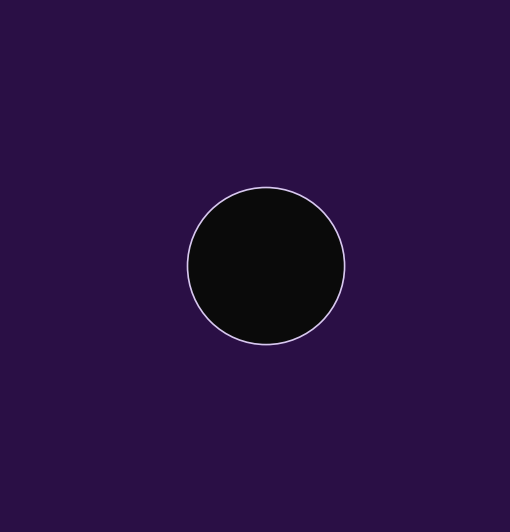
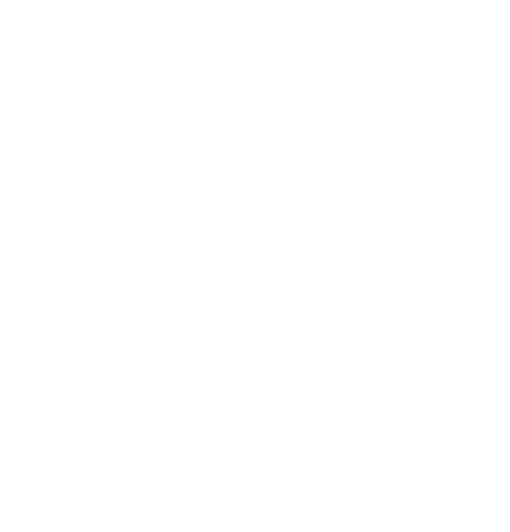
part: (266, 266) -> none

